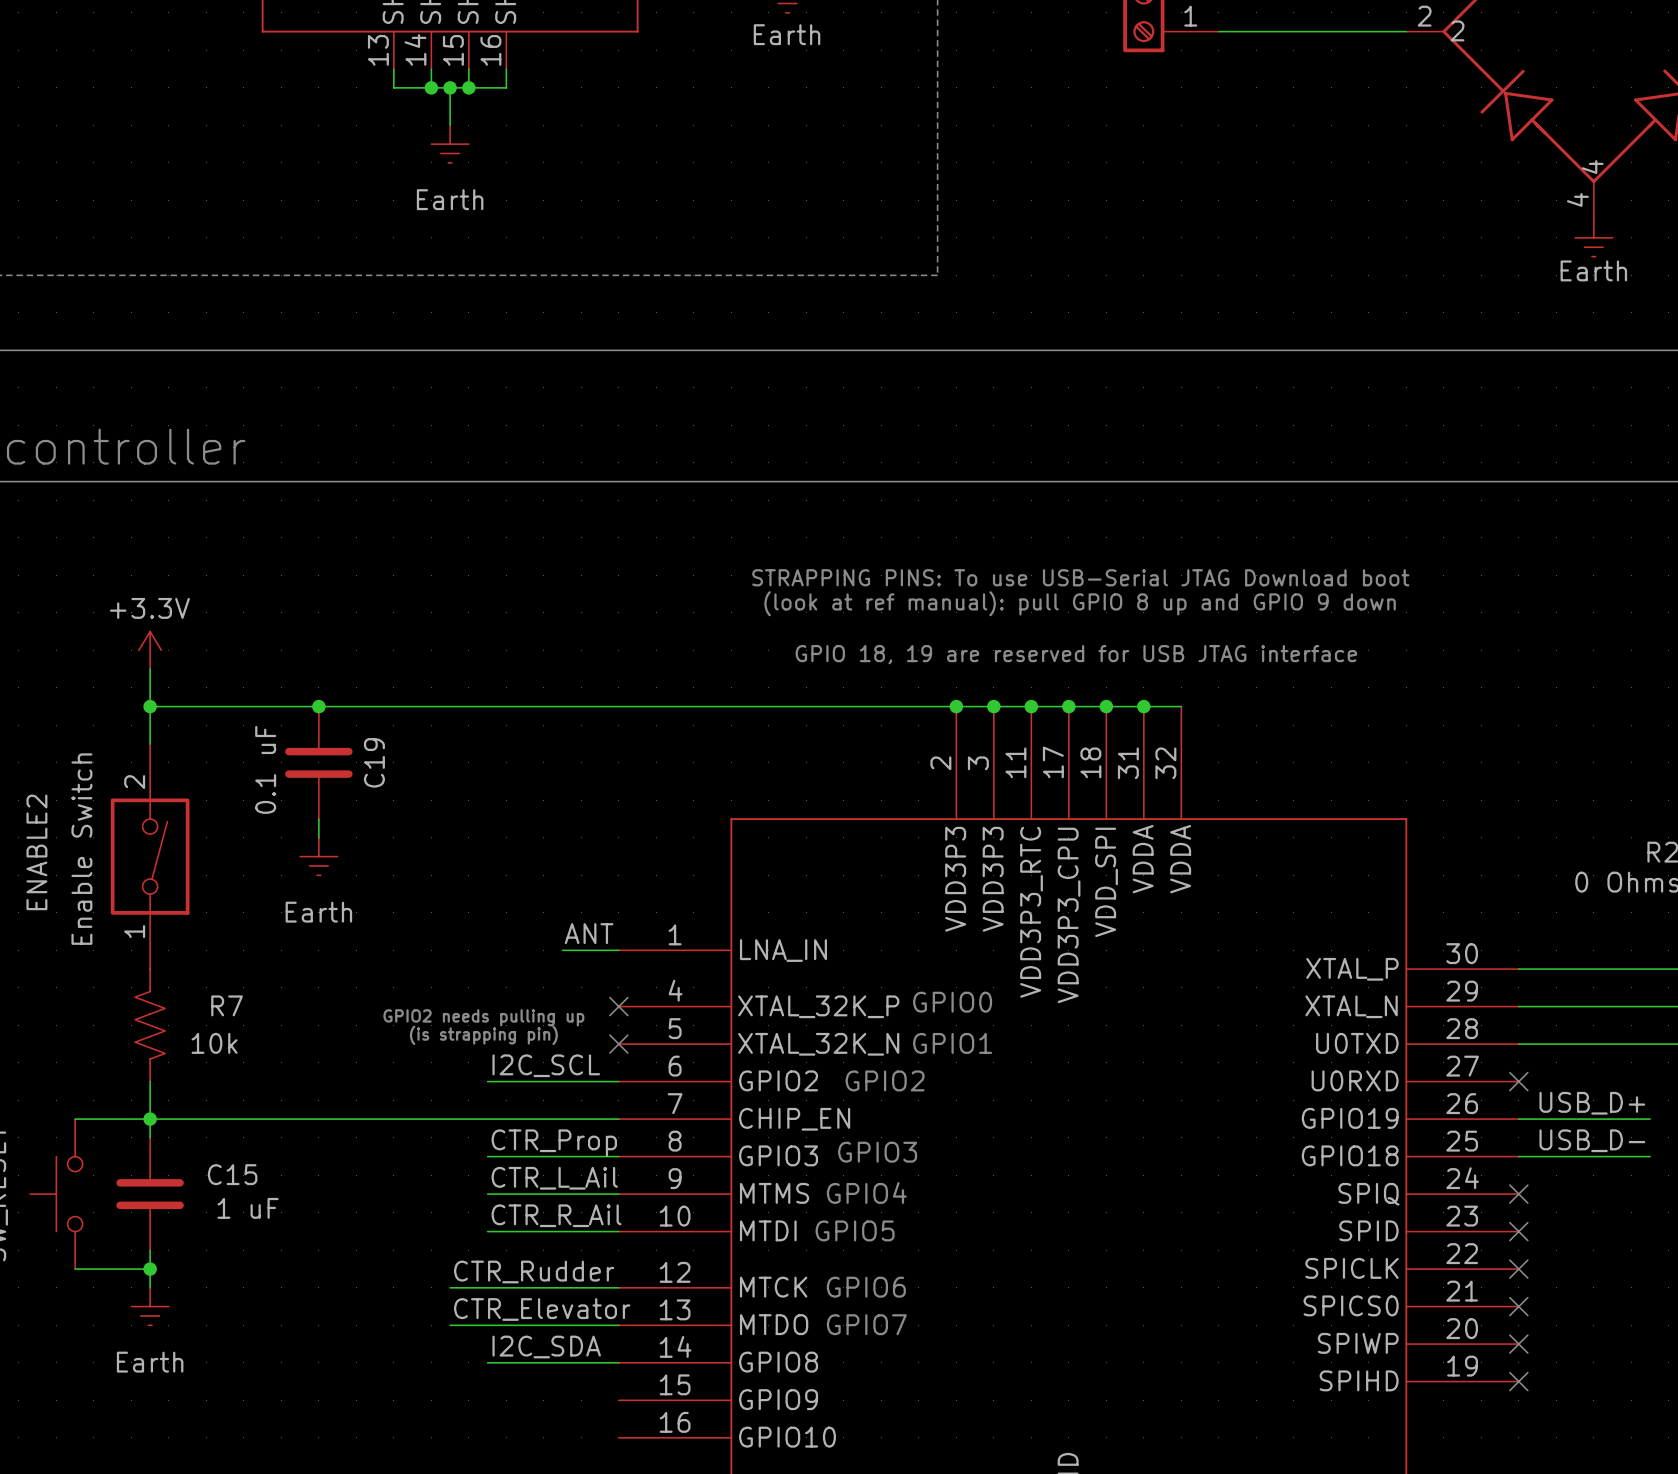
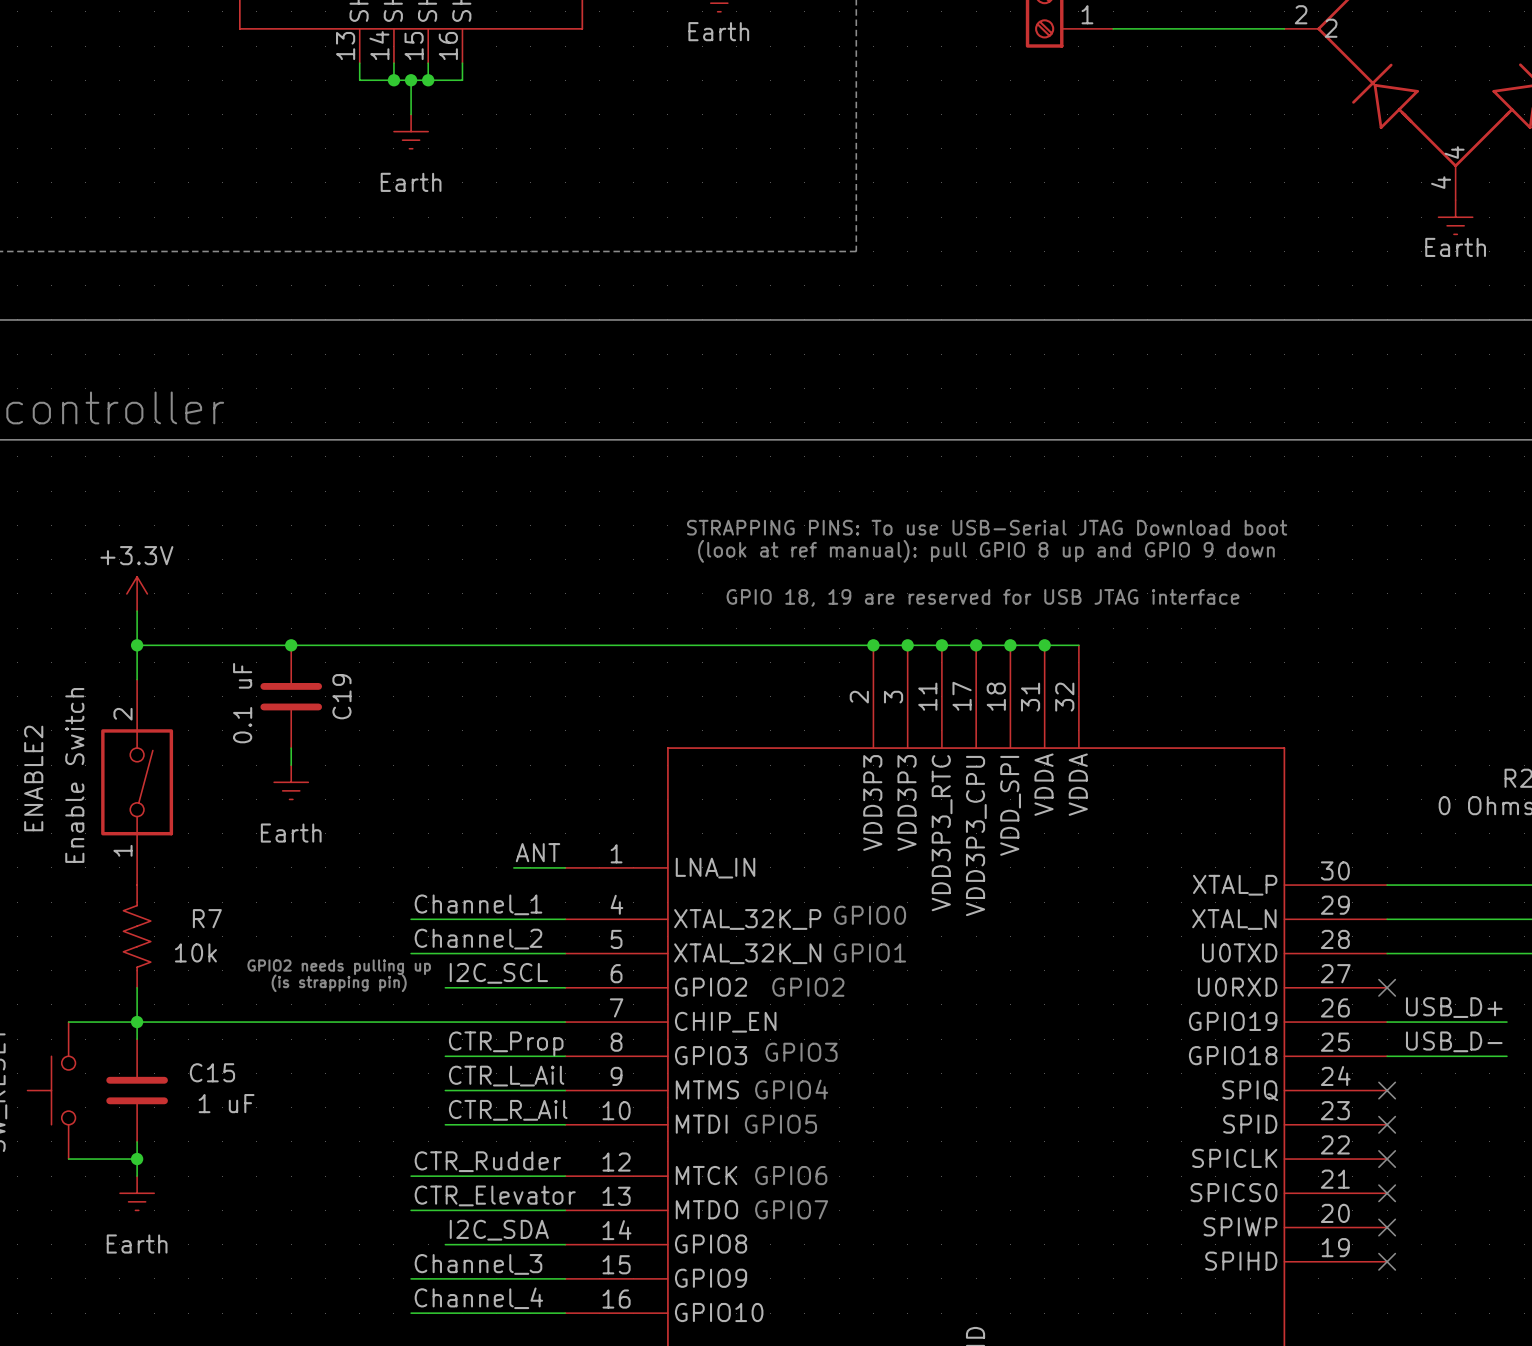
label: none -> Channel_1 (478, 904)
wire: none -> (411, 919) (565, 919)
no-connect mark: (618, 1006) -> none
text position: GPIO2 needs pulling up (483, 1017) -> GPIO2 needs pulling up (339, 967)
label: none -> Channel_2 (478, 939)
text position: (is strapping pin) (483, 1035) -> (is strapping pin) (339, 983)
wire: none -> (411, 953) (565, 953)
no-connect mark: (618, 1044) -> none
label: none -> Channel_3 (478, 1264)
wire: none -> (411, 1278) (565, 1278)
label: none -> Channel_4 (478, 1298)
wire: none -> (411, 1313) (565, 1313)

